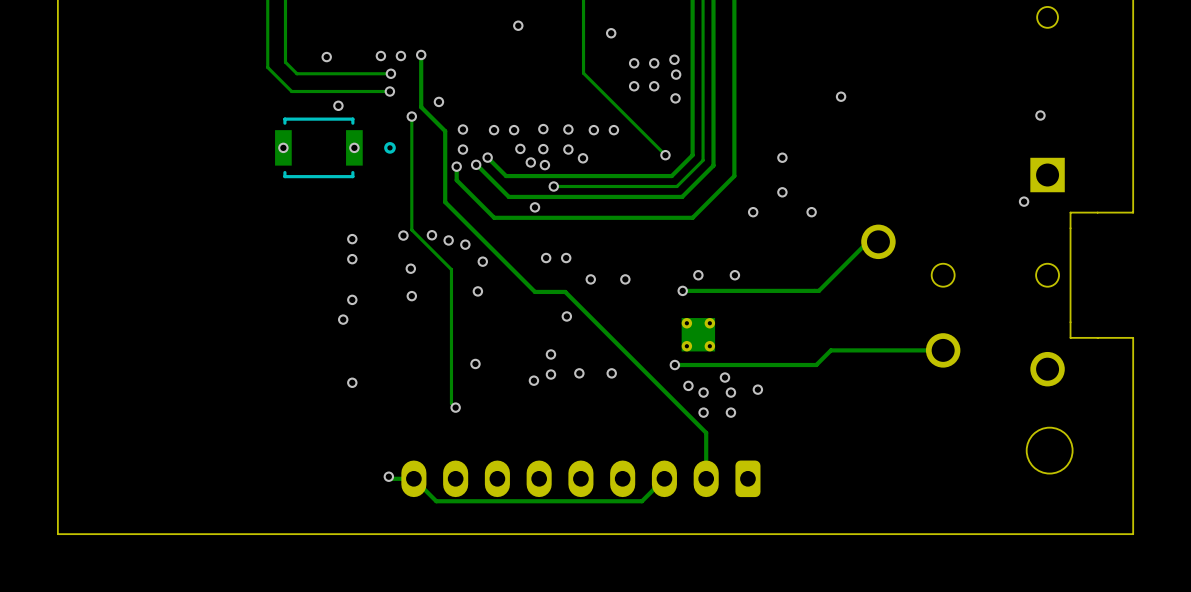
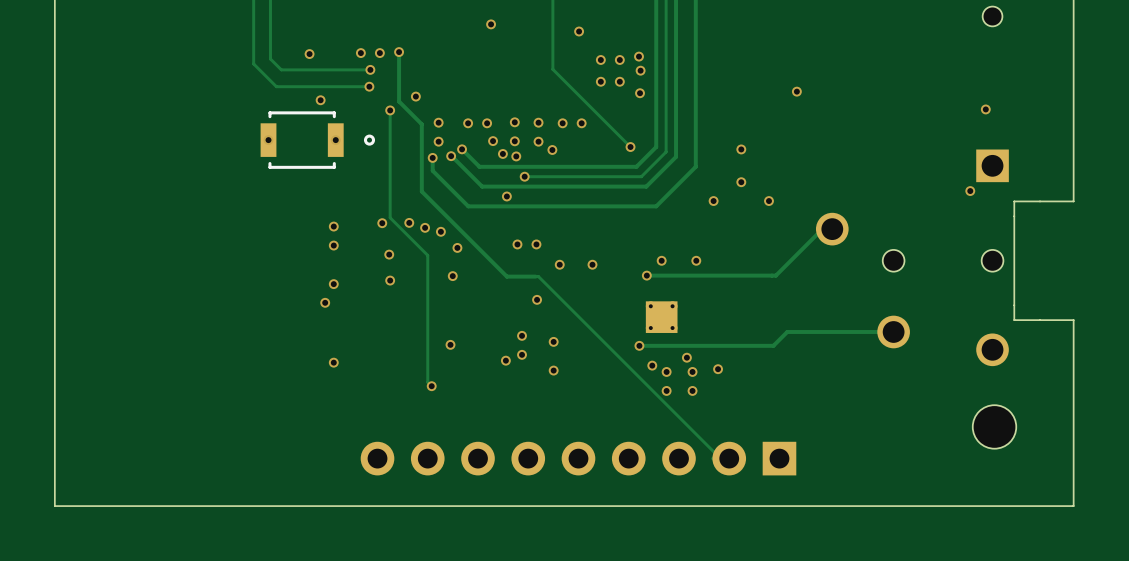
track: (565, 291) (706, 432) (706, 478) -> (535, 276) (538, 276) (720, 458)
via: none -> (553, 341)
via: (579, 373) -> none
via: (611, 373) -> none
via: none -> (553, 370)
track: (388, 476) (390, 478) (413, 478) (436, 501) (641, 501) (664, 478) -> none
via: (388, 476) -> none
part: (580, 478) -> none
part: none -> (578, 458)

